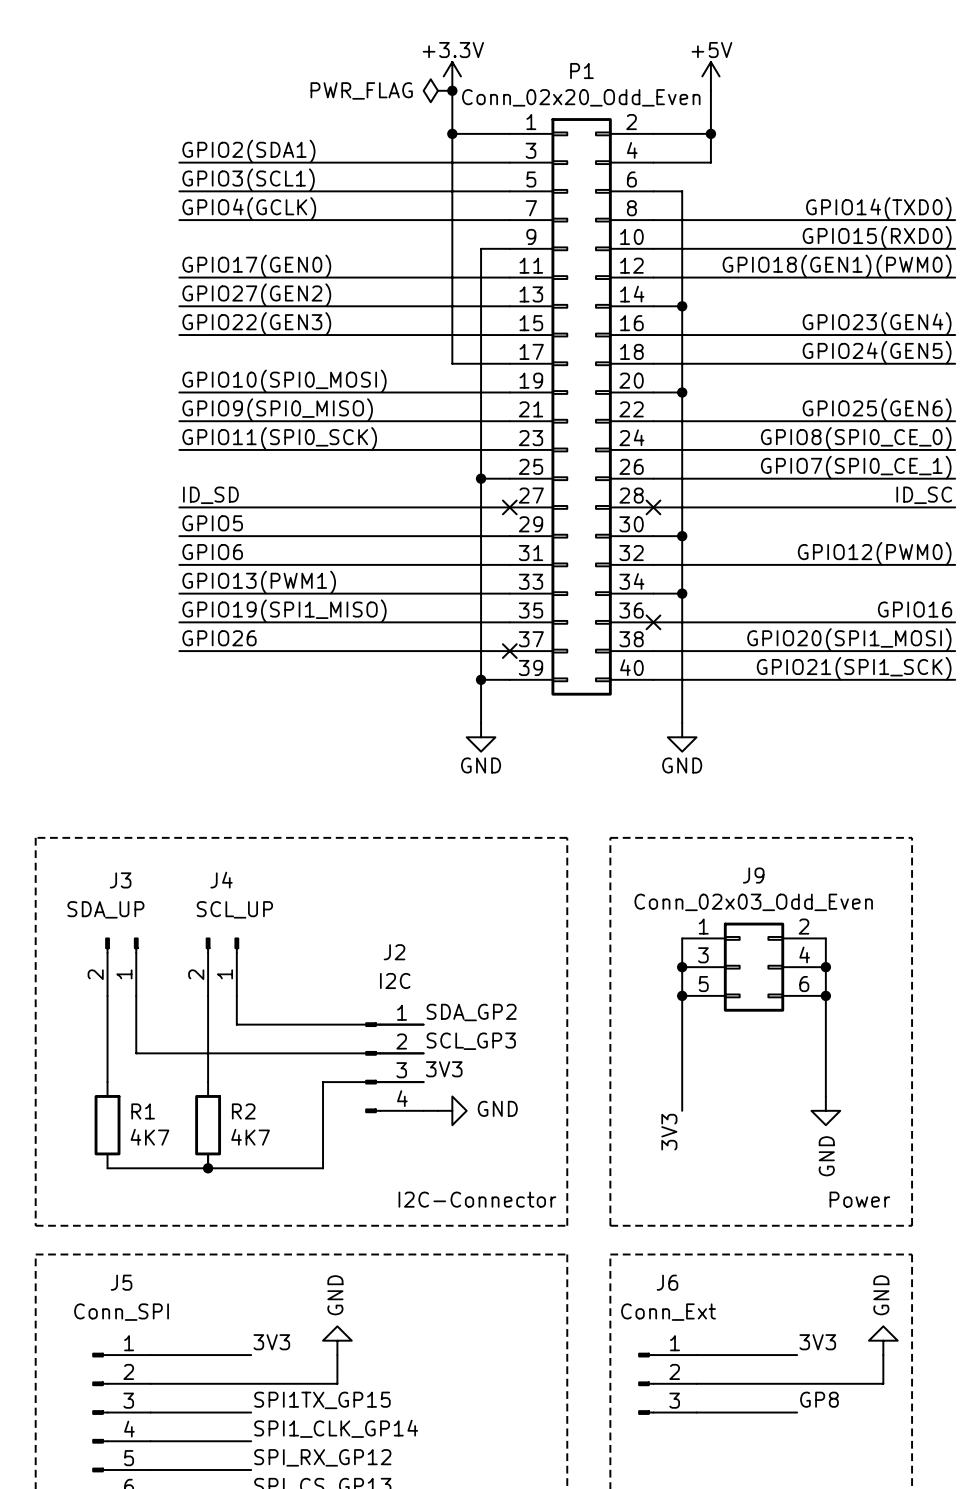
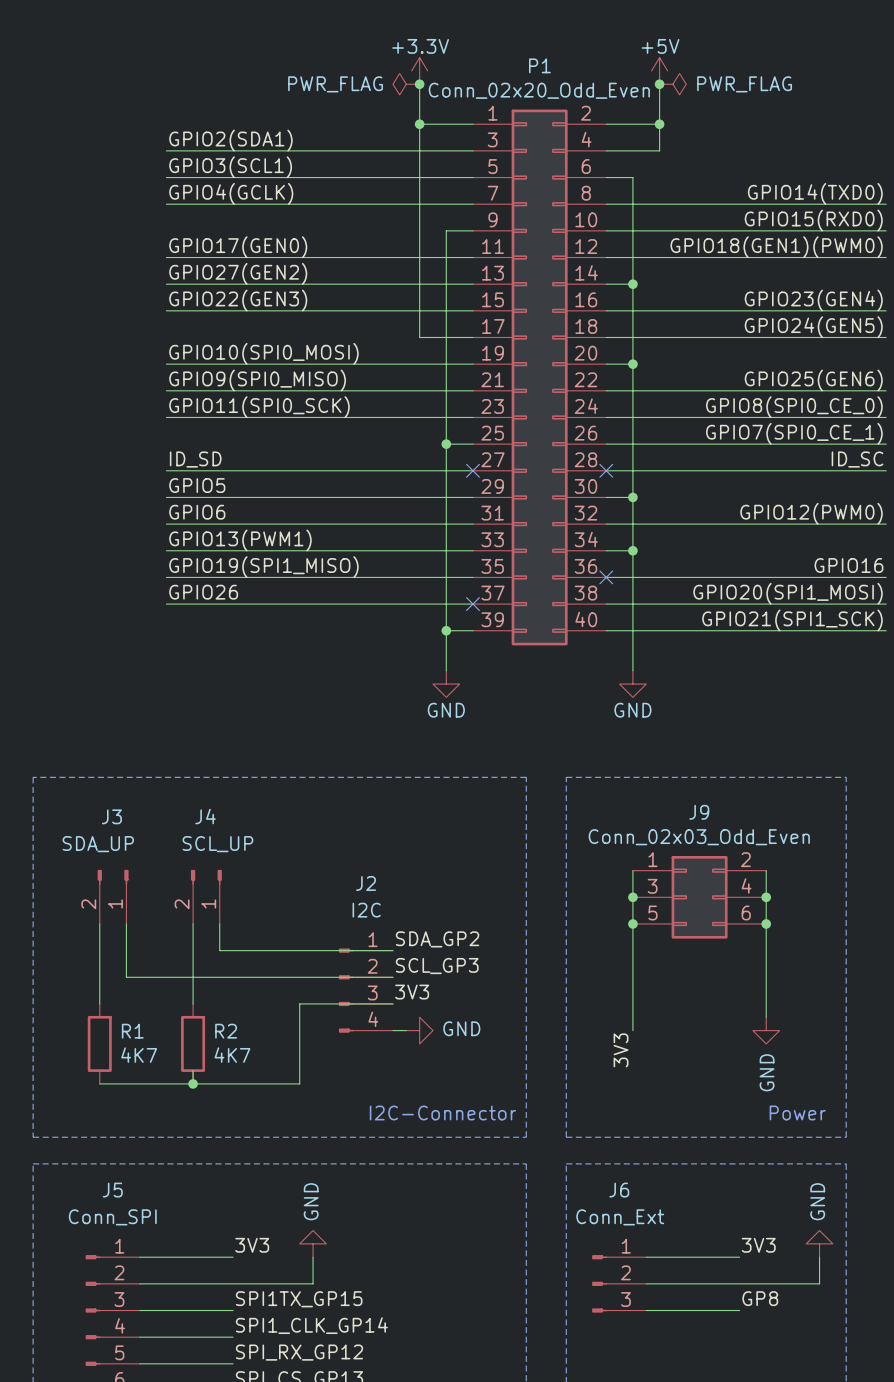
junction: none -> (659, 84)
power symbol: none -> PWR_FLAG (672, 84)

